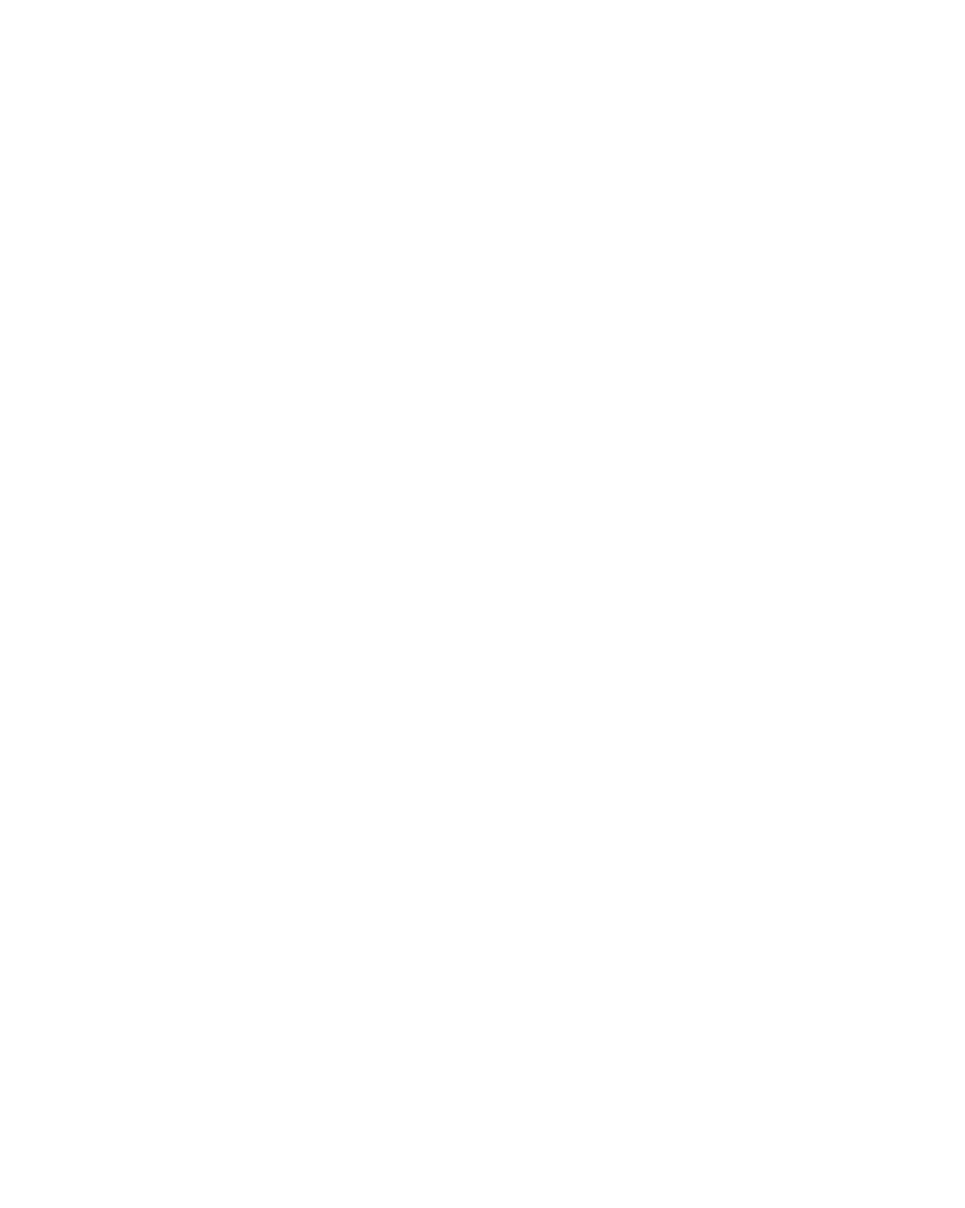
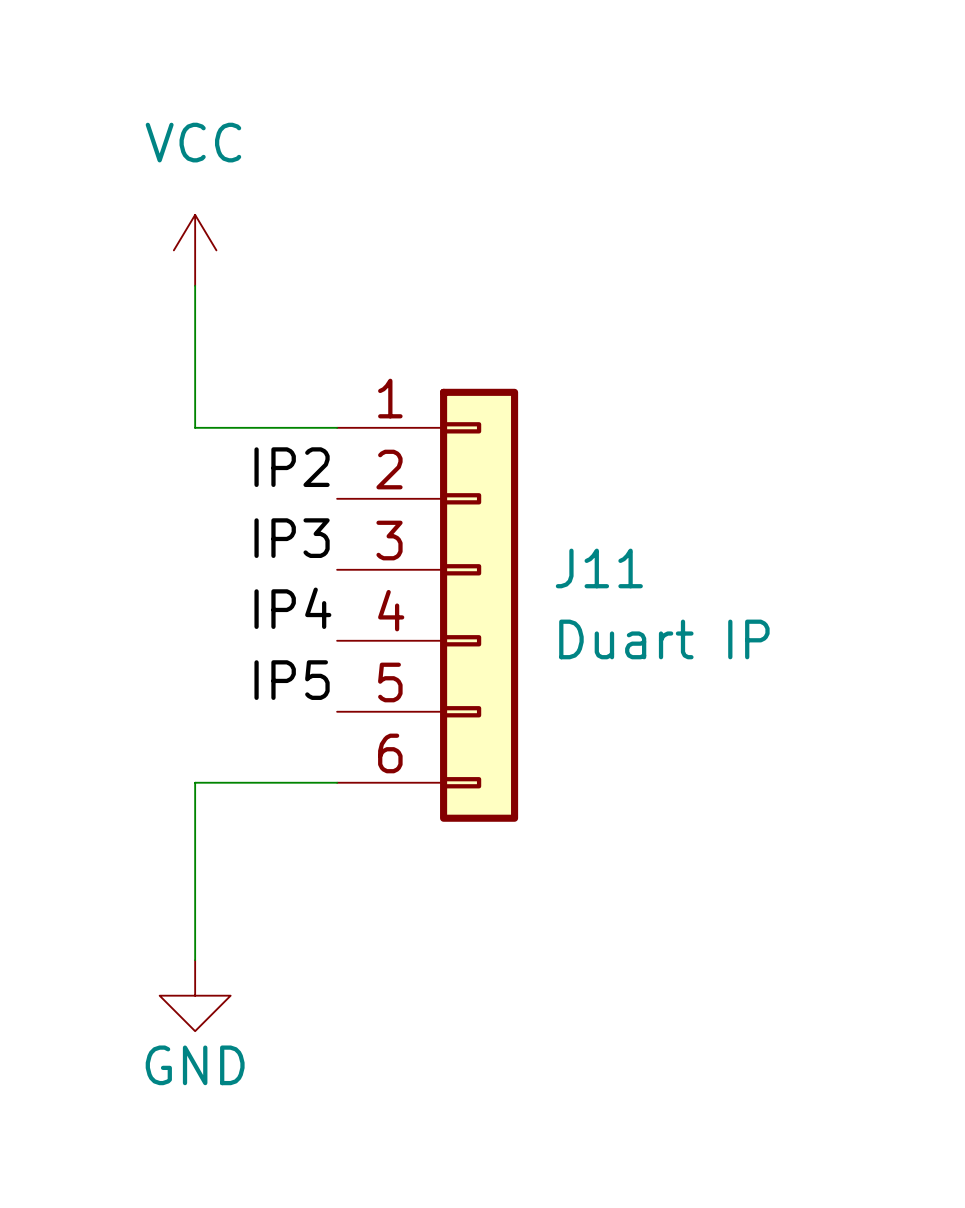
power symbol: none -> VCC (195, 250)
wire: none -> (195, 285) (195, 427) (337, 427)
label: none -> IP2 (292, 467)
label: none -> IP3 (292, 538)
J11: none -> Duart IP (427, 605)
label: none -> IP4 (292, 608)
label: none -> IP5 (292, 680)
wire: none -> (337, 782) (195, 782) (195, 960)
power symbol: none -> GND (195, 995)

